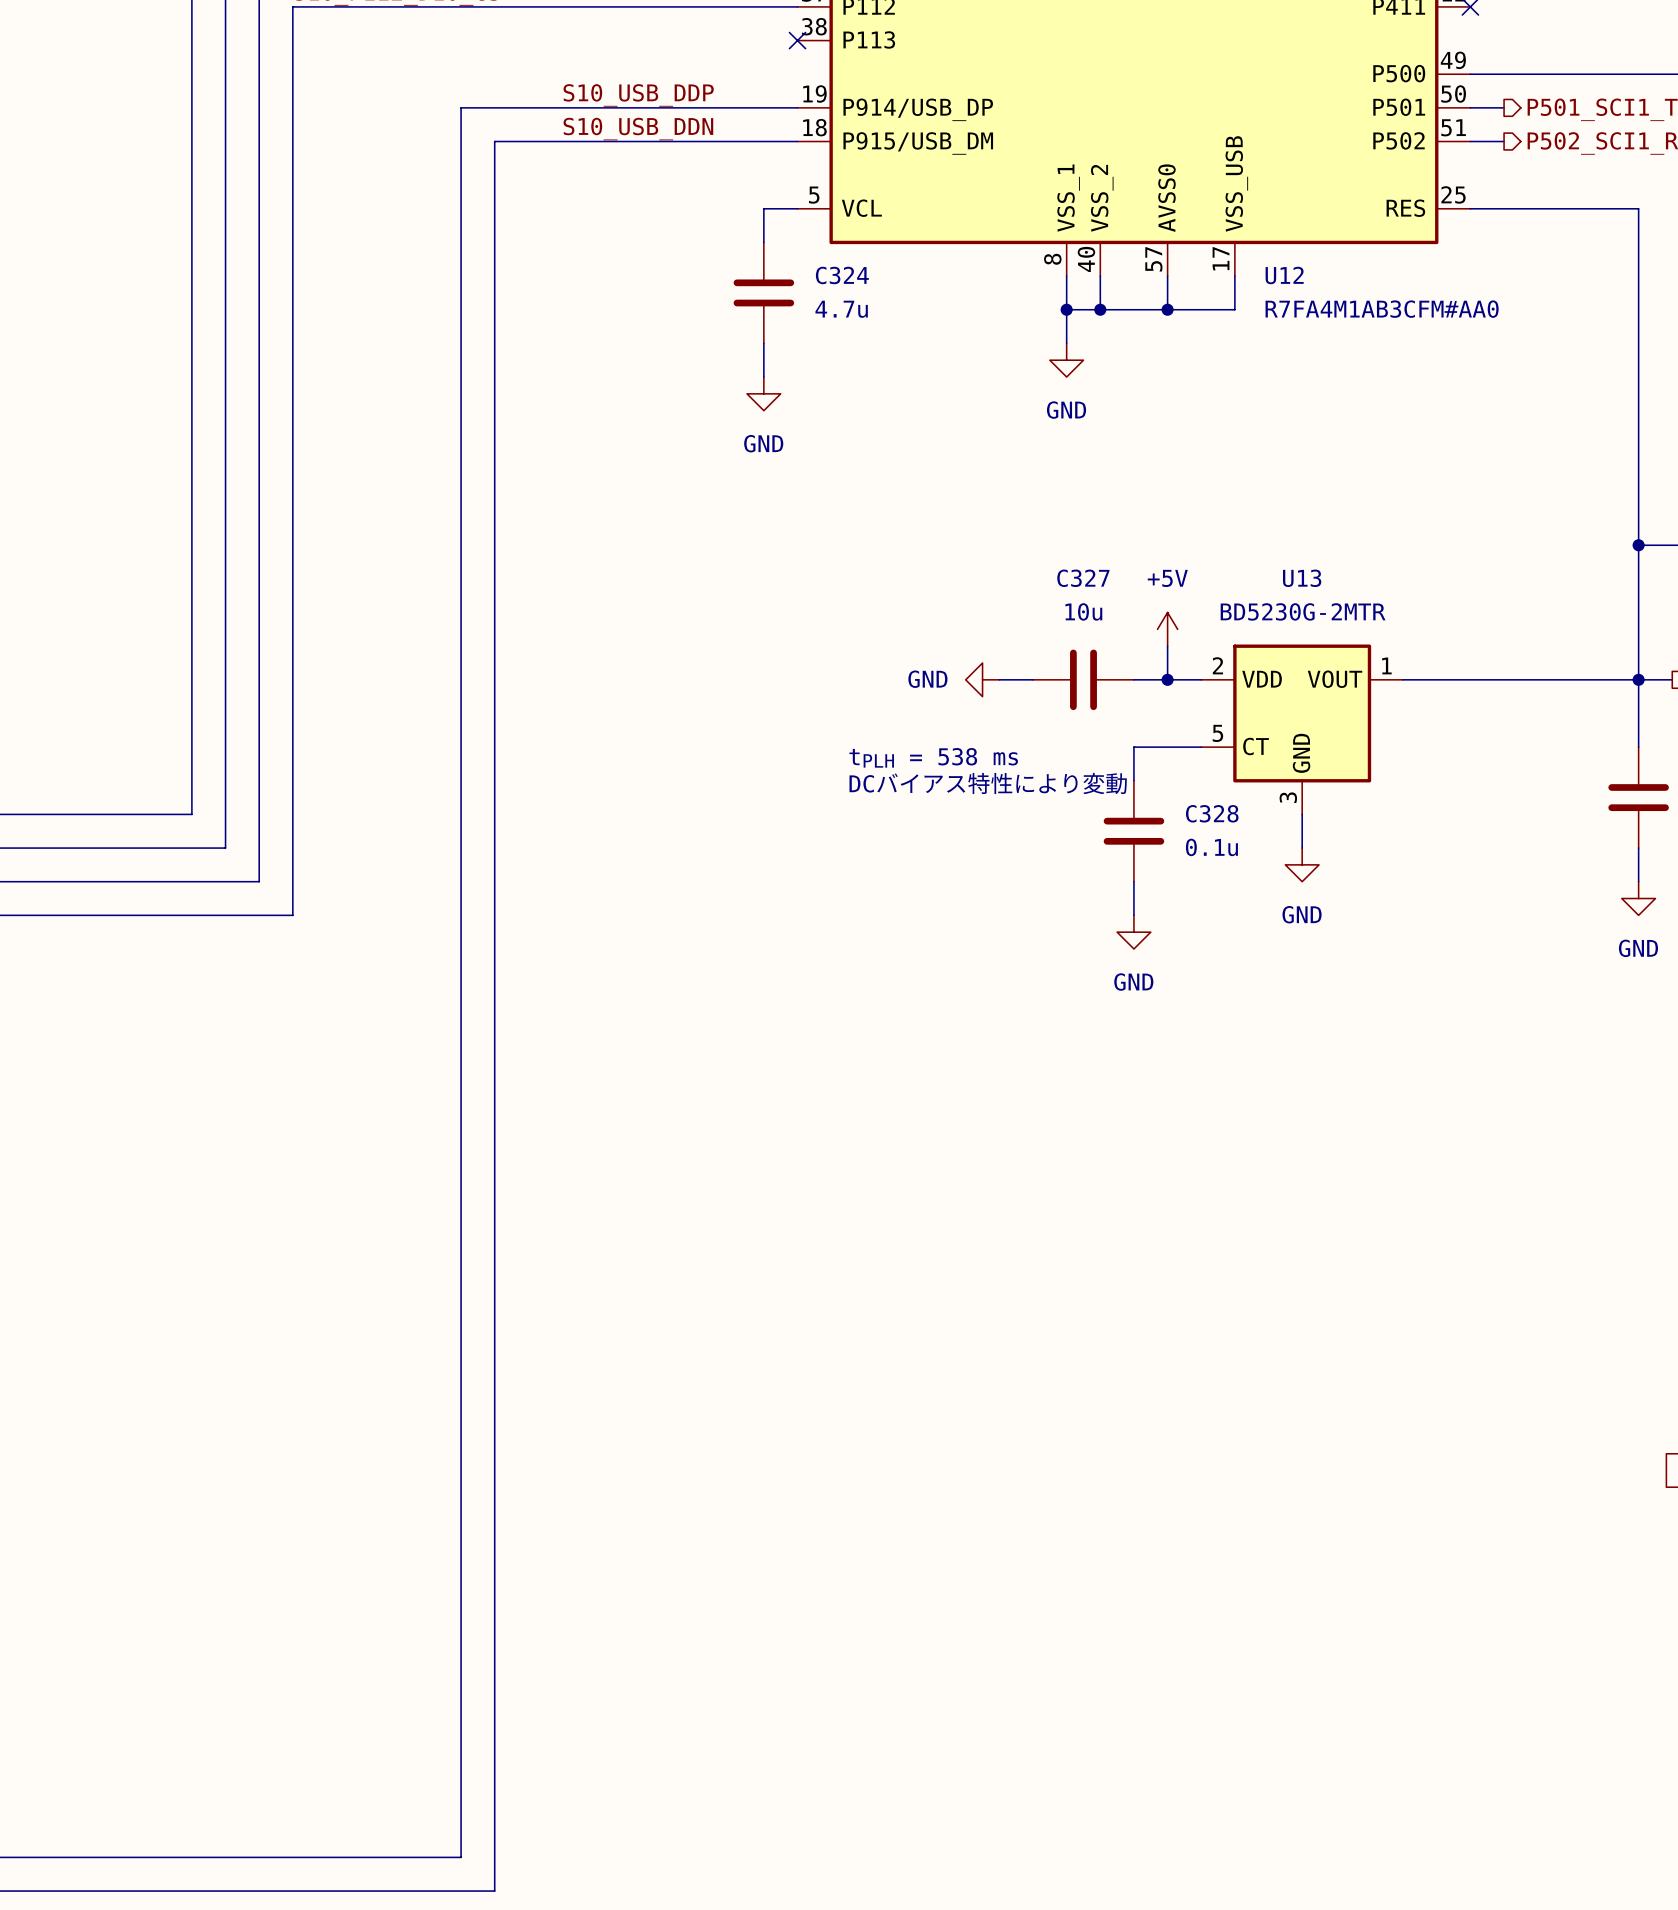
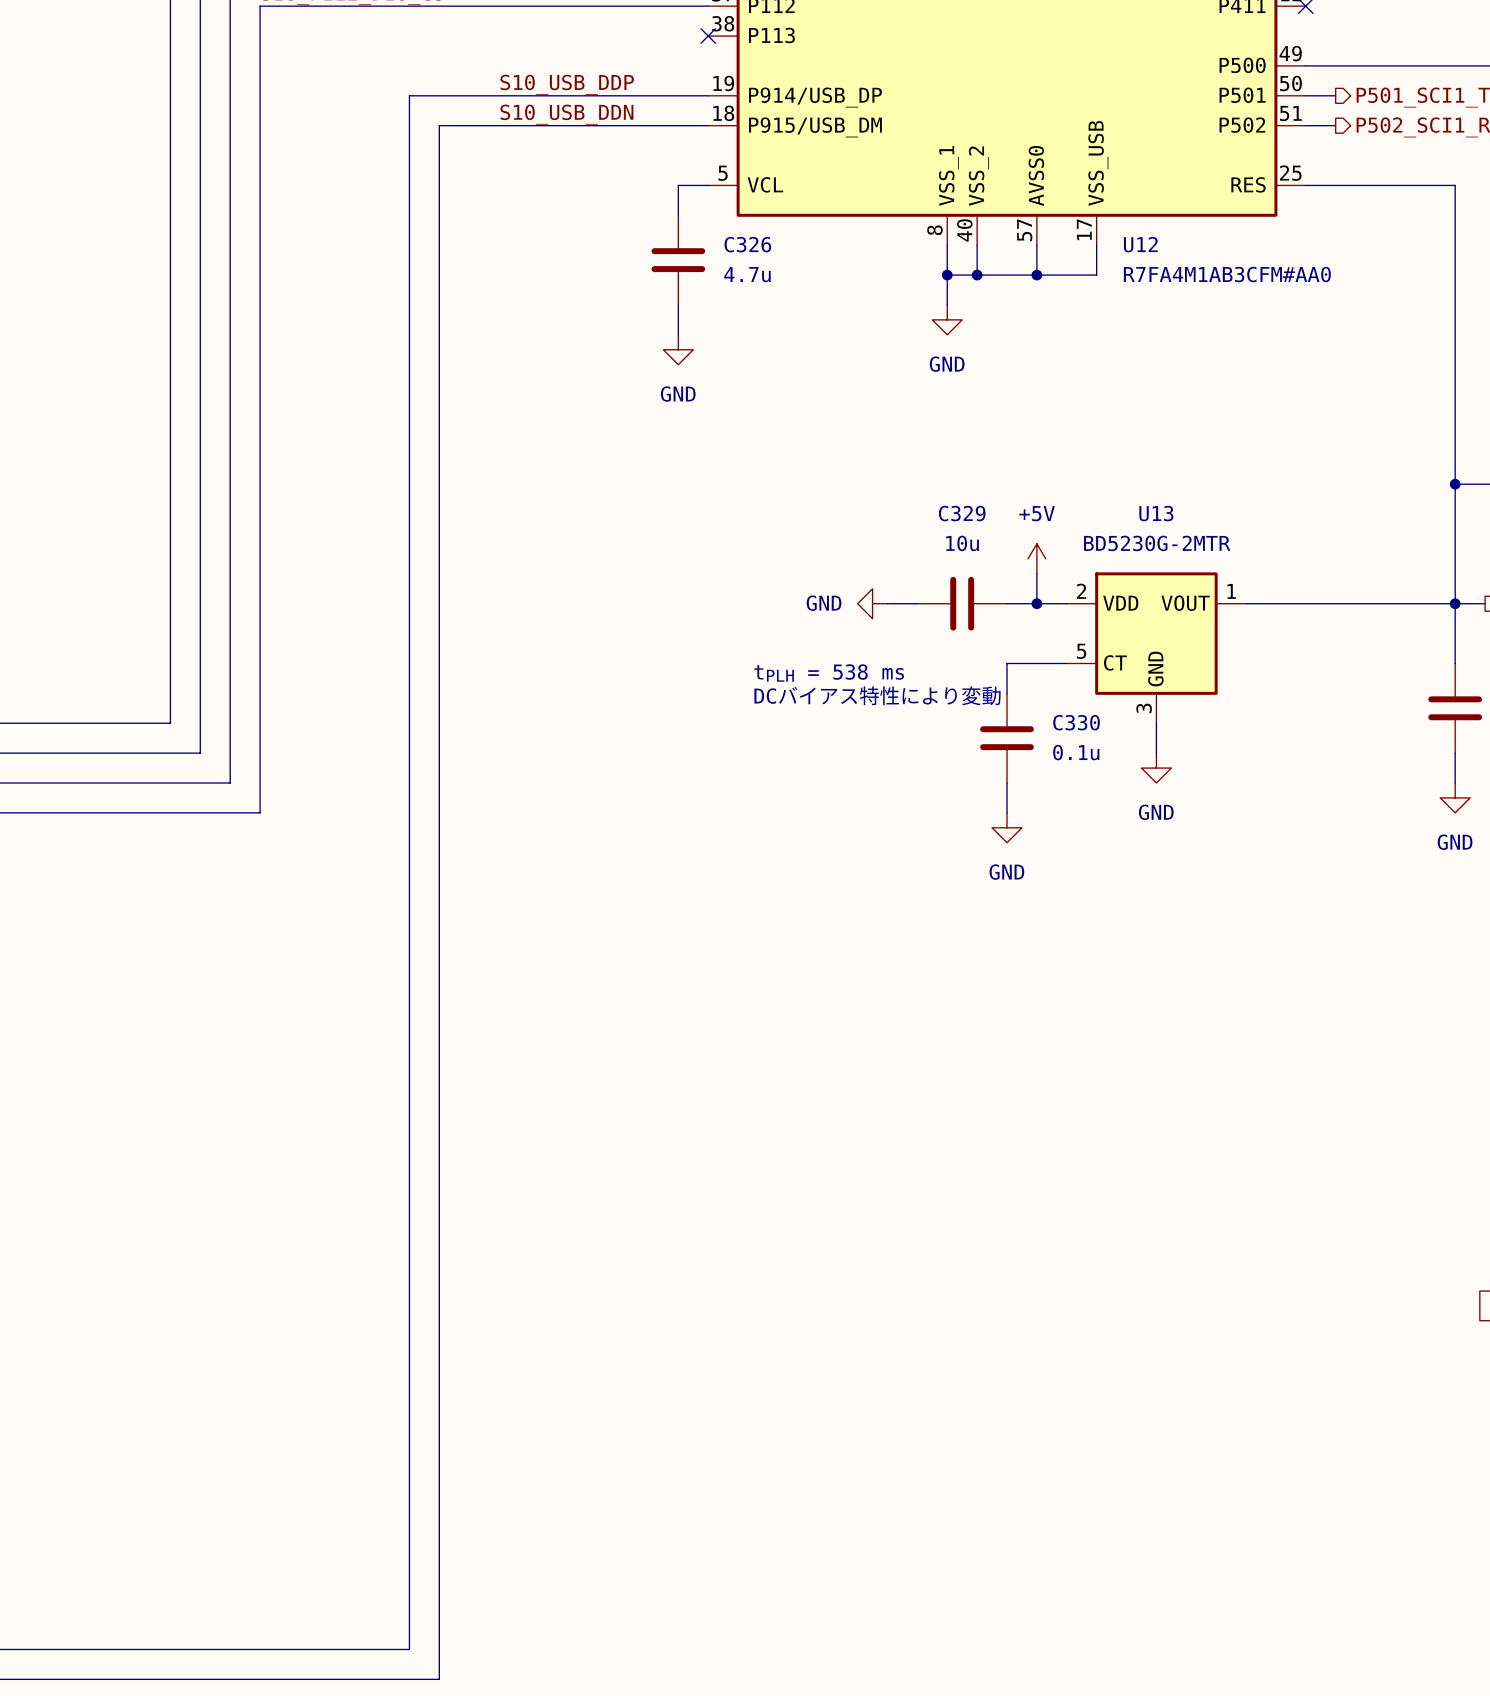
C324 name: C324 (842, 275) -> C326 (747, 244)
C327 name: C327 (1083, 578) -> C329 (962, 513)
C328 name: C328 (1212, 813) -> C330 (1076, 722)

